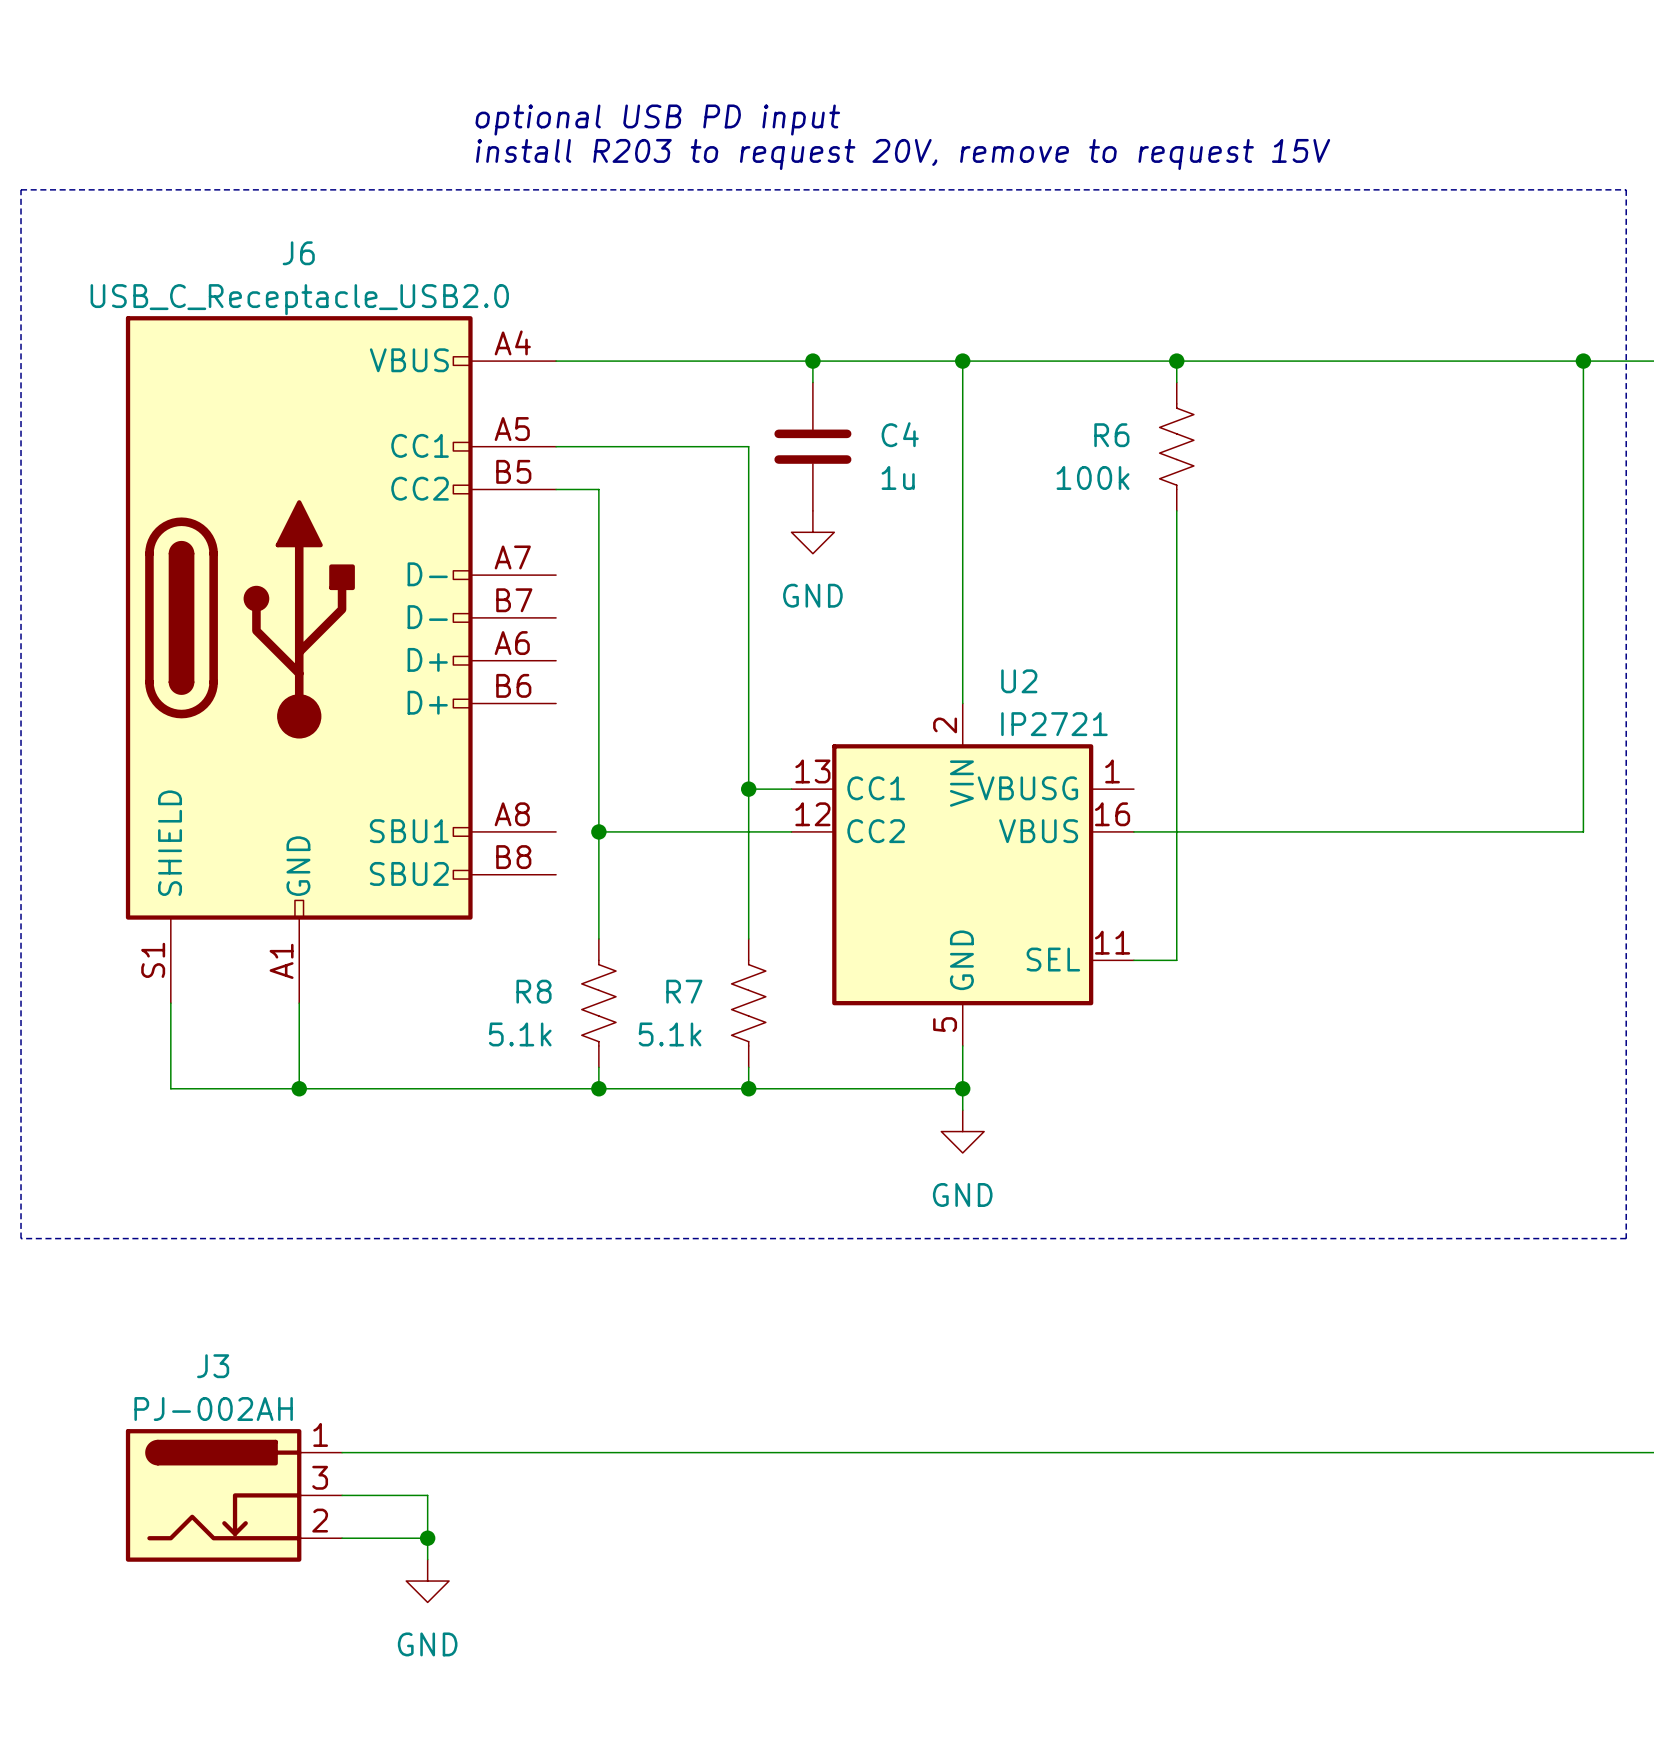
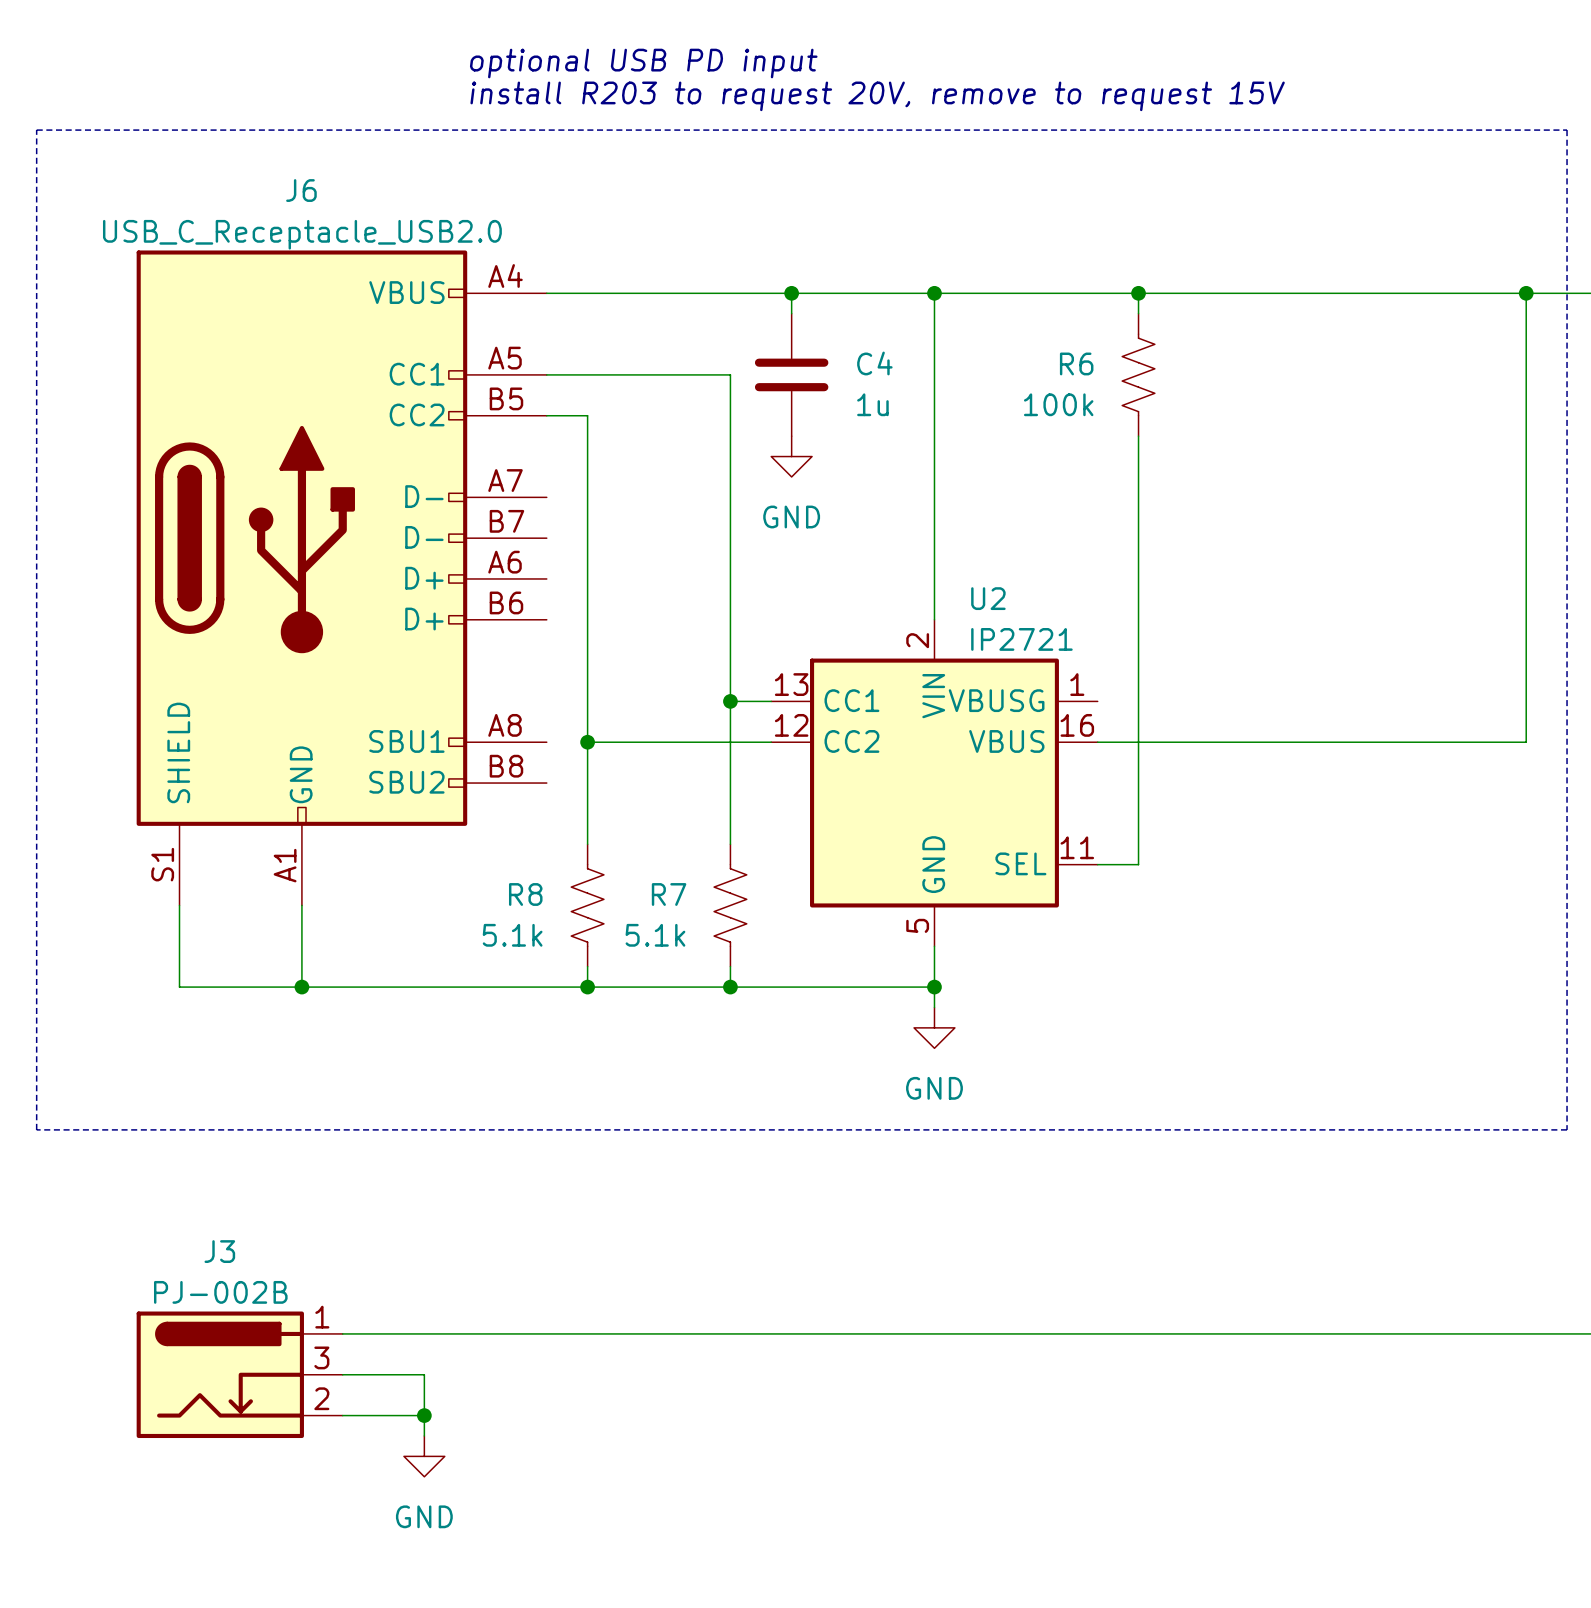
J3 value: PJ-002AH (213, 1409) -> PJ-002B (220, 1292)

